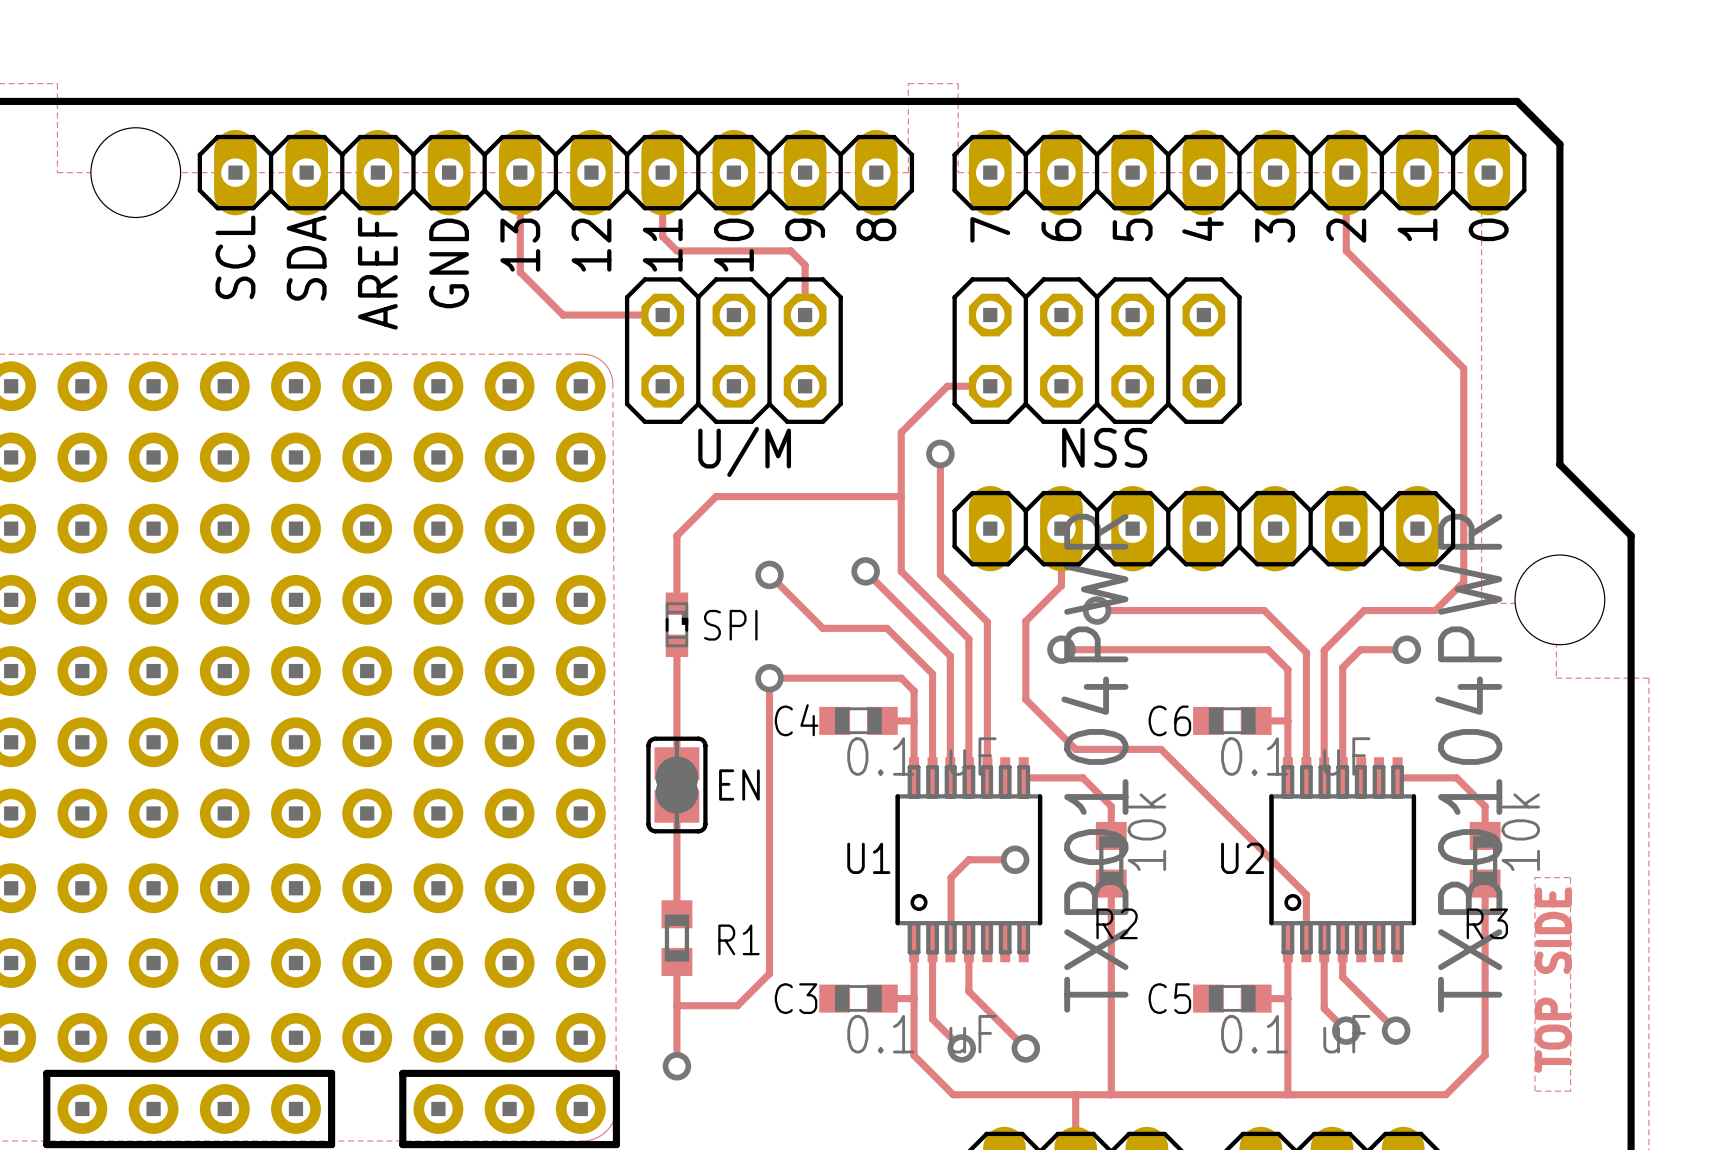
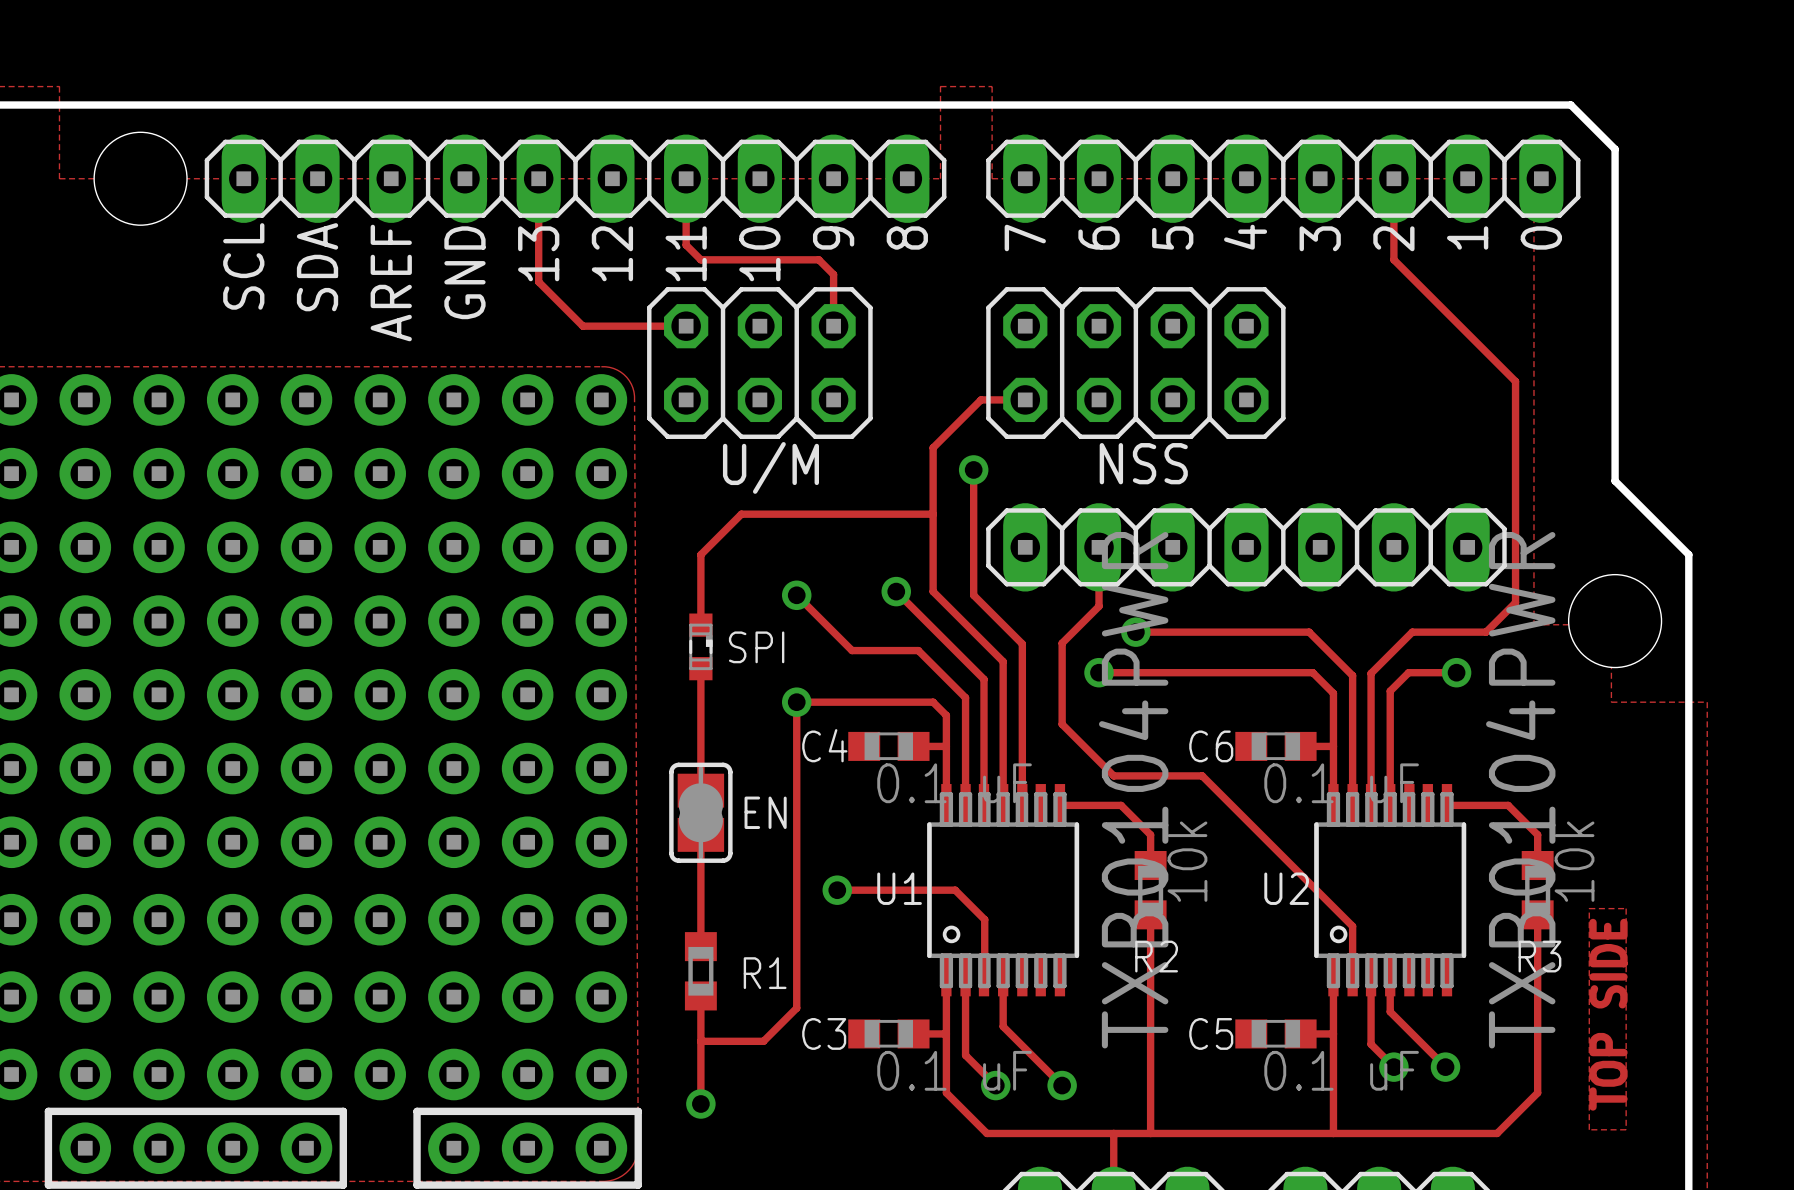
via: none -> (837, 890)
track: (1015, 859) (968, 859) (951, 877) (951, 888) -> (837, 890) (955, 890) (984, 919)
via: (1015, 859) -> none

